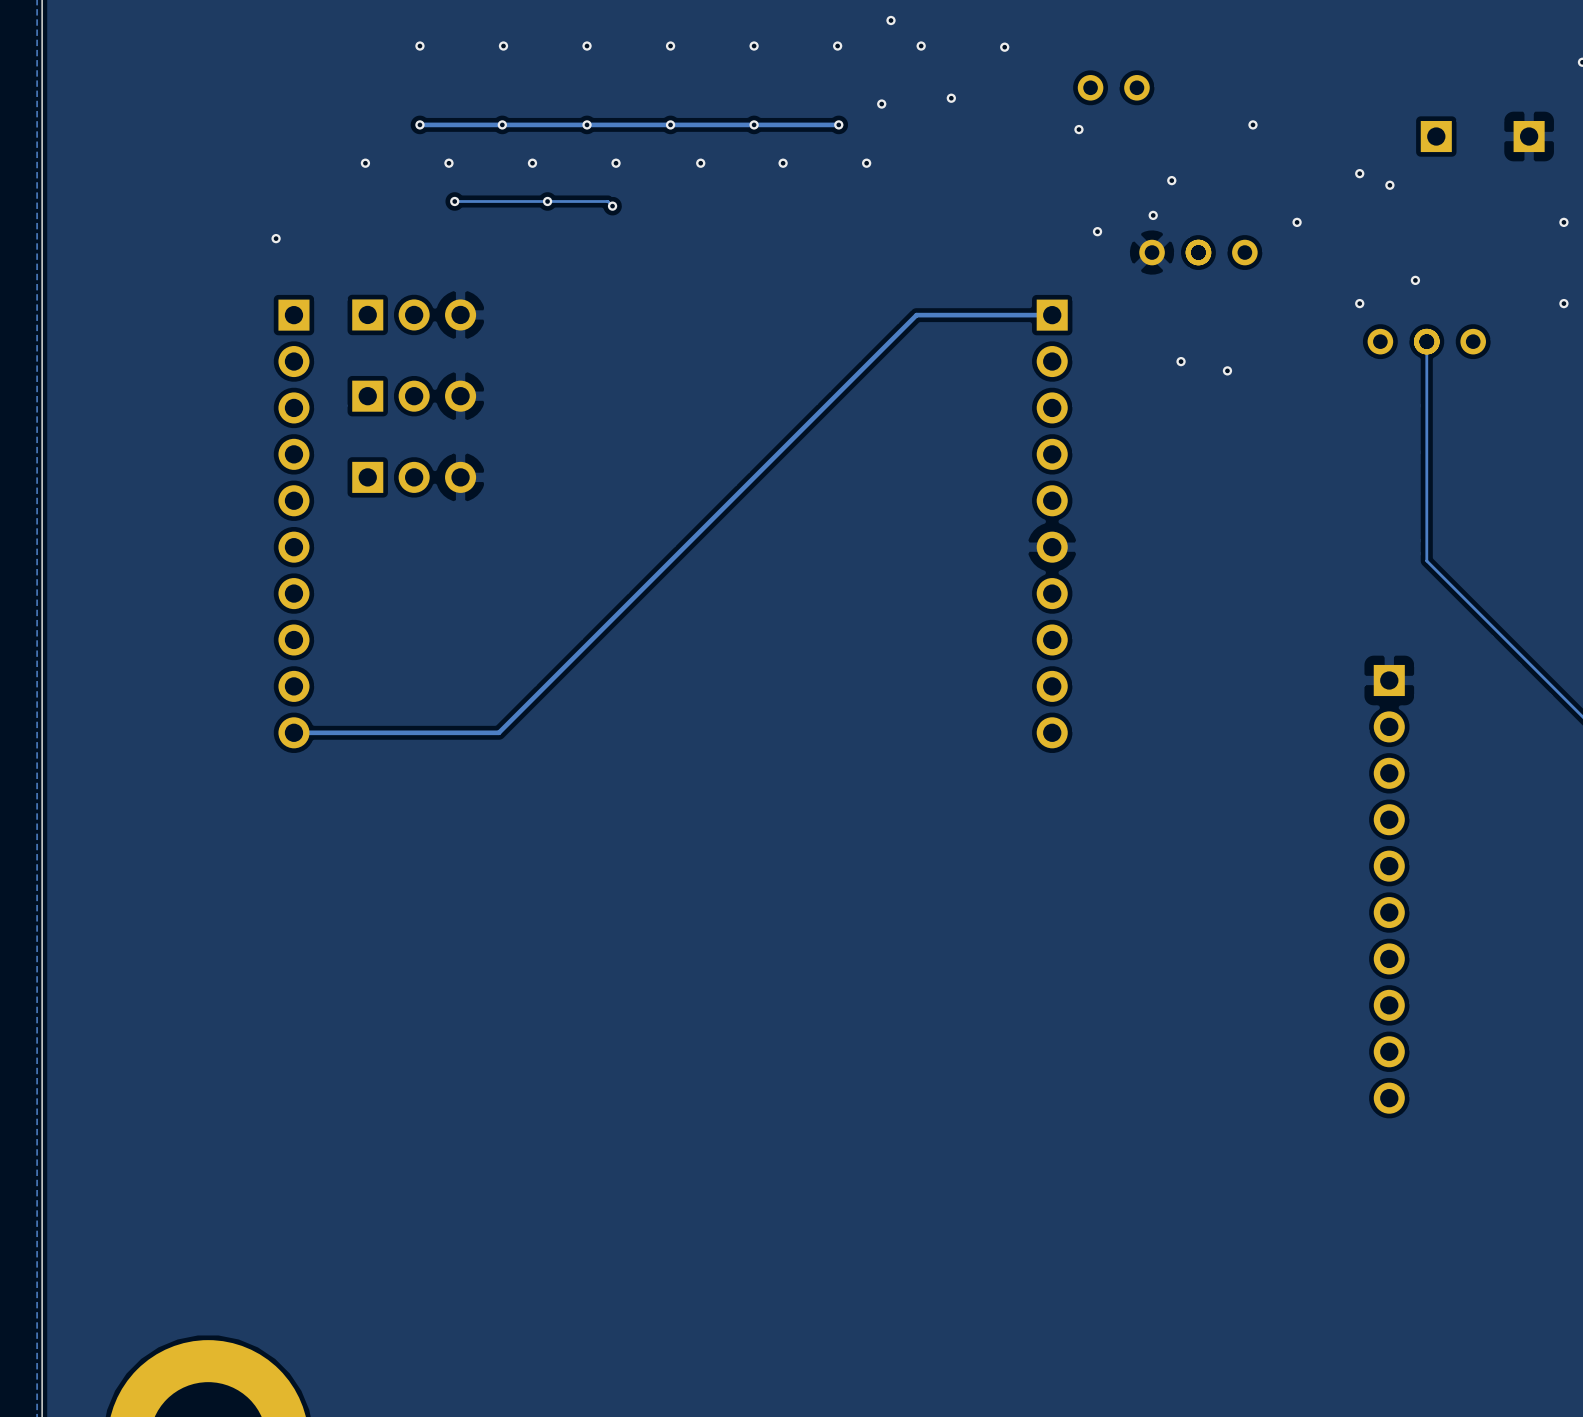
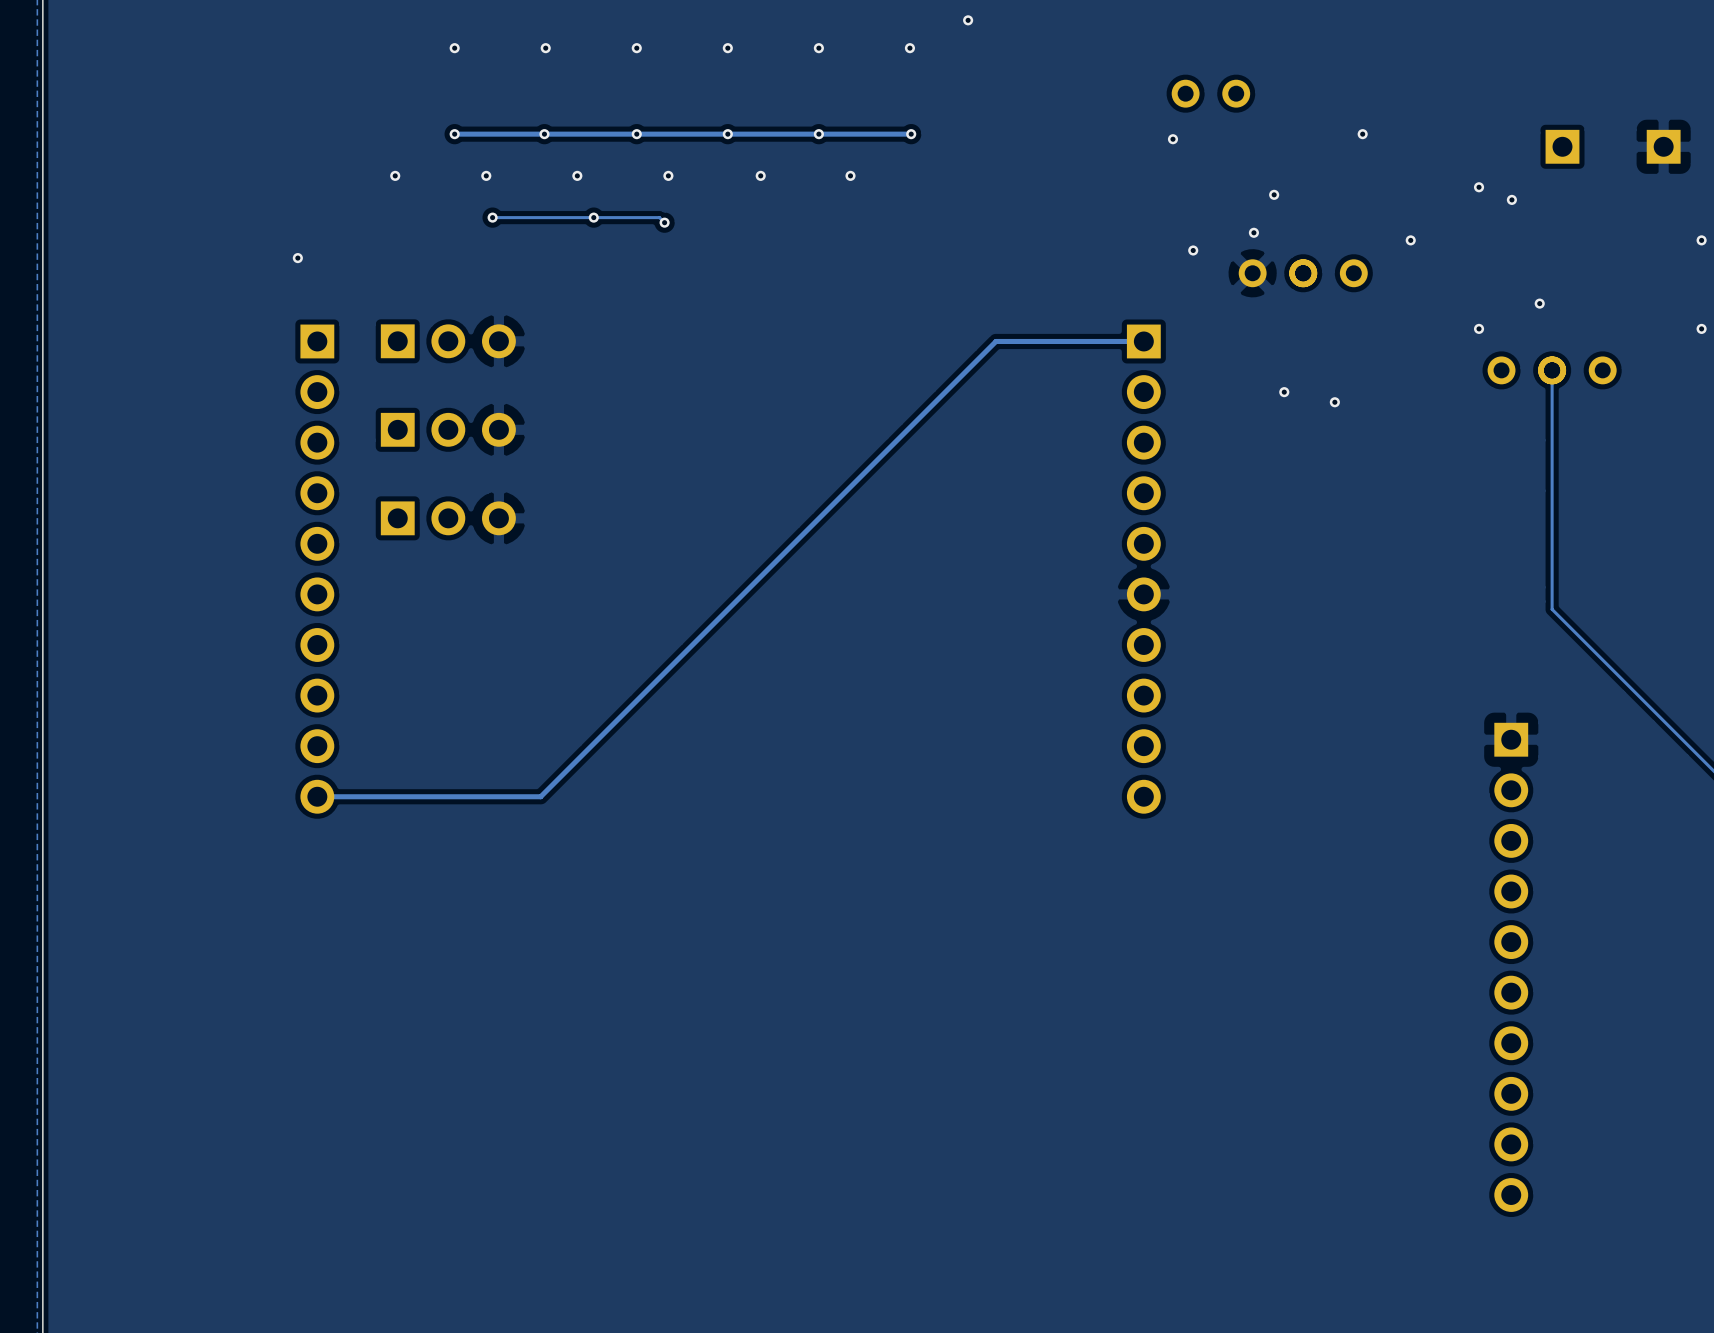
via: (921, 46) -> none
via: (1004, 47) -> none
via: (951, 98) -> none
via: (881, 104) -> none
via: (866, 163) -> none

